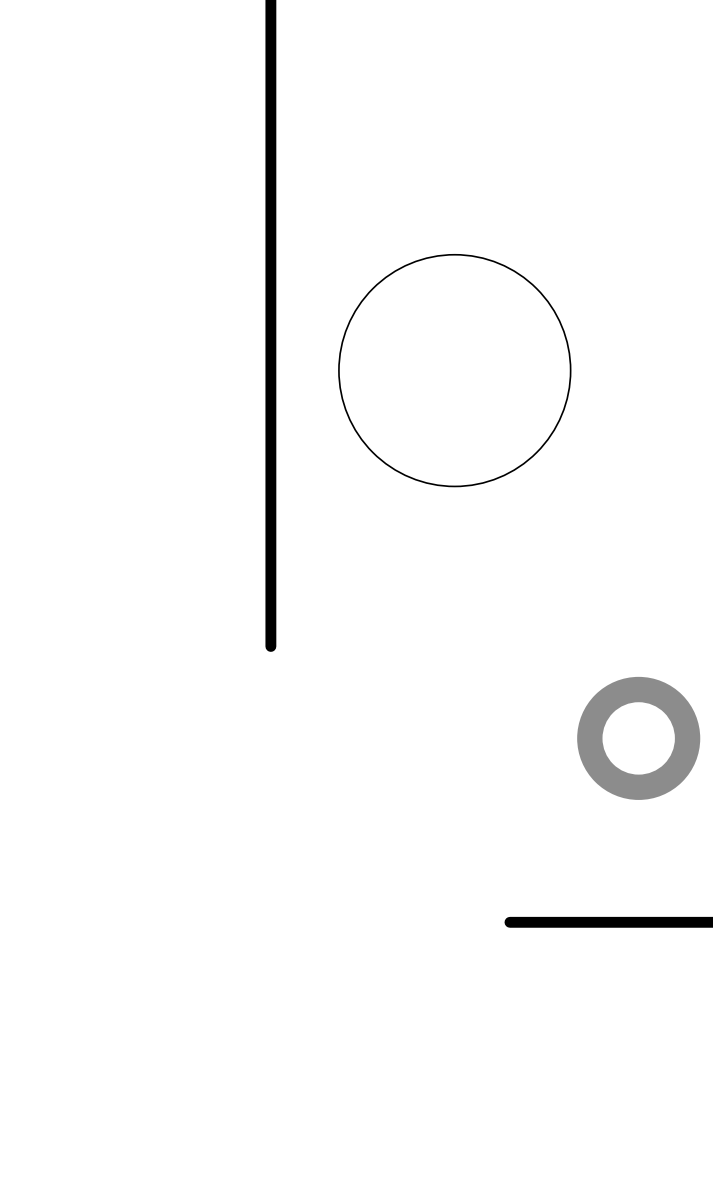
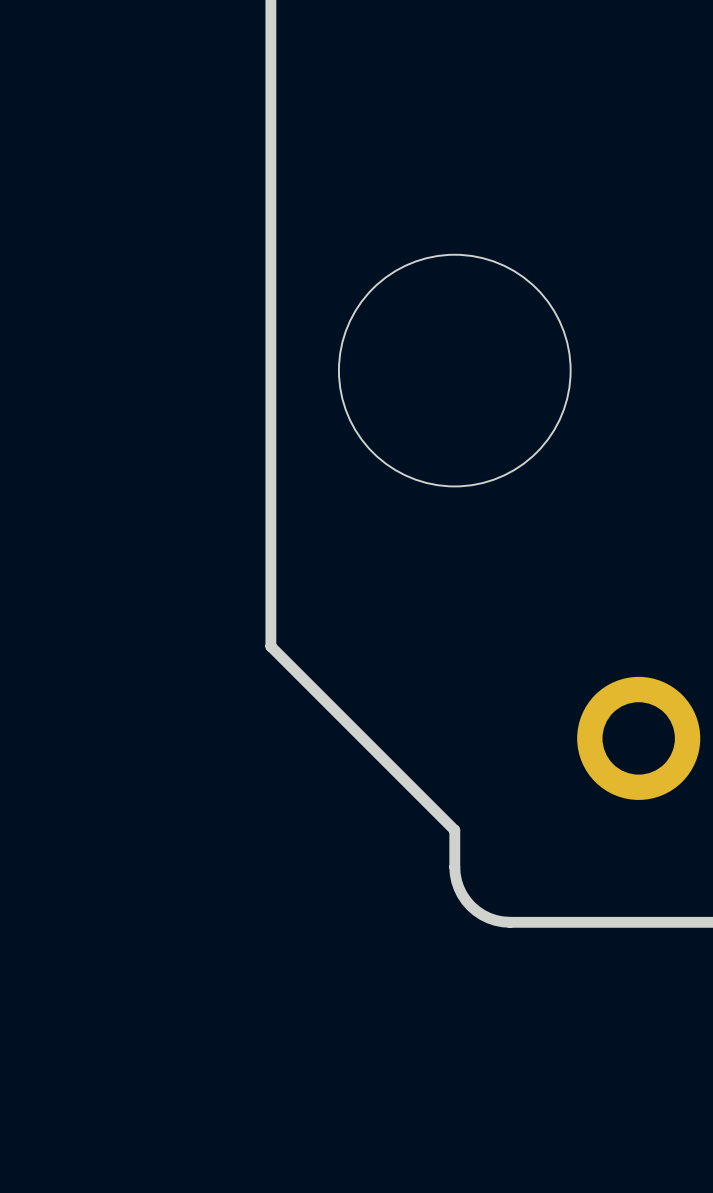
board edge: none -> (270, 646) (454, 830) (455, 874) (458, 888) (466, 900) (482, 914) (495, 920) (509, 922)

